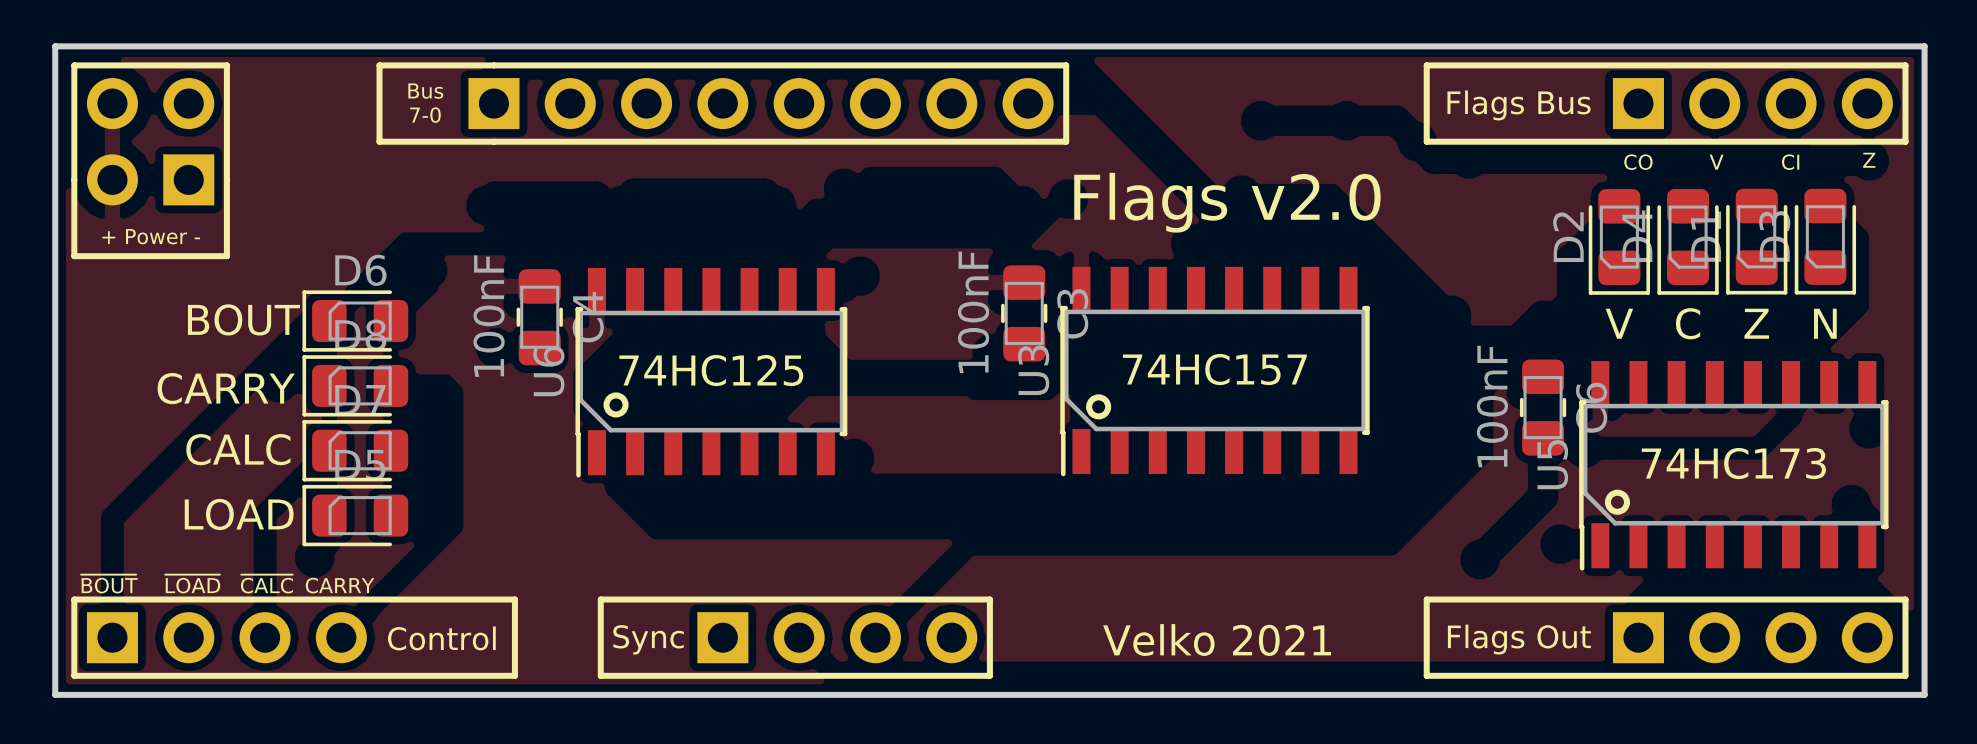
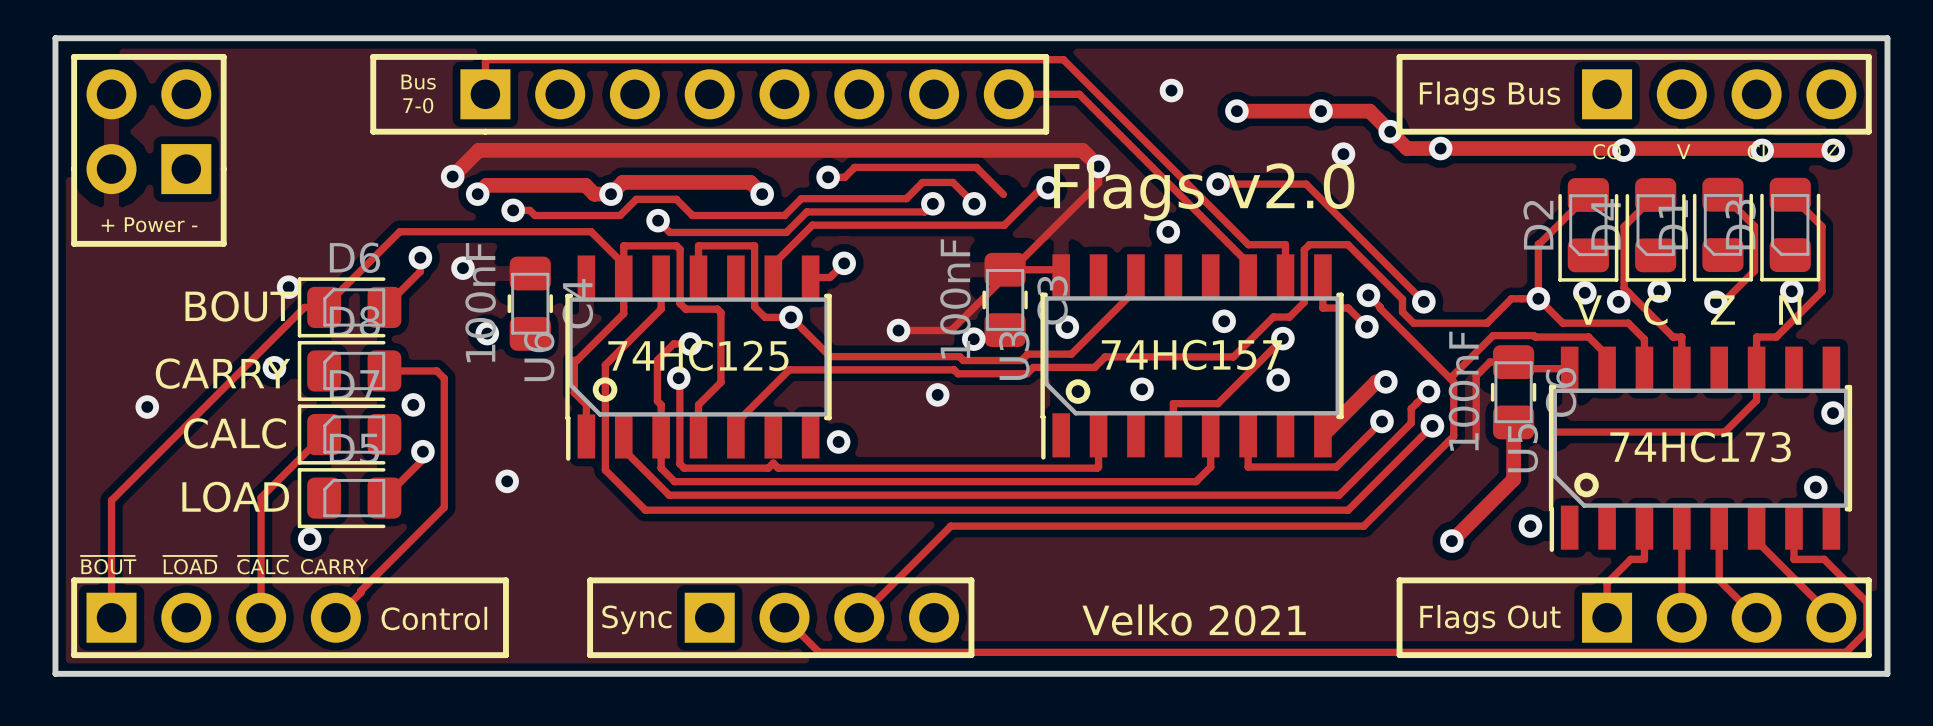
via: none -> (1171, 90)
track: none -> (485, 94) (485, 61) (487, 59) (1063, 59) (1248, 244) (1285, 244) (1285, 276)
track: none -> (1008, 94) (1079, 94) (1248, 263) (1248, 276)
track: none -> (1236, 111) (1369, 111) (1407, 148) (1759, 148)
via: none -> (1236, 111)
via: none -> (1321, 111)
via: none -> (1390, 131)
via: none -> (1440, 148)
via: none -> (1623, 150)
track: none -> (1762, 150) (1833, 150)
via: none -> (1762, 150)
via: none -> (1833, 150)
via: none -> (1343, 154)
via: none -> (1098, 166)
track: none -> (452, 176) (478, 150) (1082, 150) (1098, 166) (1098, 183) (951, 330) (898, 330)
via: none -> (452, 176)
track: none -> (828, 177) (844, 177) (854, 167) (976, 167) (1003, 194)
via: none -> (828, 177)
track: none -> (1218, 184) (1306, 184) (1423, 301)
via: none -> (1218, 184)
track: none -> (1048, 187) (1041, 187) (1004, 225) (812, 225) (773, 264) (773, 277)
via: none -> (1048, 187)
track: none -> (477, 194) (486, 185) (585, 185) (594, 194) (611, 194) (622, 182) (750, 182) (762, 194)
via: none -> (477, 194)
via: none -> (611, 194)
via: none -> (762, 194)
track: none -> (1588, 194) (1538, 244) (1538, 298)
track: none -> (1655, 194) (1624, 226) (1624, 288) (1628, 292)
track: none -> (1722, 194) (1754, 226) (1754, 270) (1723, 302) (1715, 302)
track: none -> (1790, 194) (1821, 226) (1821, 291) (1776, 337) (1756, 337) (1756, 400) (1724, 432) (1554, 432)
track: none -> (932, 203) (924, 211) (806, 211) (786, 232) (669, 232) (658, 220)
via: none -> (932, 203)
track: none -> (974, 203) (952, 182) (922, 182) (906, 198) (801, 198) (784, 215) (692, 215) (676, 199) (636, 199) (620, 215) (534, 215) (529, 210) (513, 210)
via: none -> (974, 203)
via: none -> (513, 210)
via: none -> (658, 220)
via: none -> (1168, 231)
track: none -> (420, 257) (420, 271) (384, 307)
via: none -> (420, 257)
track: none -> (623, 264) (591, 231) (399, 231) (324, 307) (304, 307) (111, 500) (111, 617)
track: none -> (844, 263) (830, 277) (810, 277)
via: none -> (844, 263)
via: none -> (462, 268)
track: none -> (1005, 269) (1054, 269) (1061, 276)
track: none -> (1135, 276) (1135, 289) (1071, 354) (1027, 354) (1021, 360) (963, 360) (959, 356) (830, 356) (790, 317) (765, 317) (754, 306) (754, 245) (698, 245) (698, 277)
track: none -> (1322, 276) (1322, 308) (1348, 308) (1366, 326)
track: none -> (661, 277) (661, 309) (605, 364) (605, 470) (645, 510) (1348, 510) (1432, 425)
via: none -> (288, 287)
via: none -> (1659, 291)
via: none -> (1791, 291)
via: none -> (1584, 292)
track: none -> (1628, 292) (1673, 337) (1681, 337) (1681, 368)
track: none -> (1368, 295) (1453, 382) (1453, 436) (1363, 526) (950, 526) (859, 617)
via: none -> (1368, 295)
track: none -> (1538, 298) (1562, 323) (1628, 323) (1644, 339) (1644, 368)
track: none -> (1538, 298) (1511, 298) (1487, 323) (1413, 323) (1402, 312) (1402, 299) (1348, 244) (1309, 244) (1304, 249) (1304, 302) (1289, 317) (1273, 317) (1233, 356) (1105, 356) (1094, 367) (1033, 367) (1026, 373) (958, 373) (954, 369) (789, 369) (735, 423) (735, 436)
via: none -> (1538, 298)
via: none -> (1423, 301)
via: none -> (1618, 301)
via: none -> (1715, 302)
via: none -> (790, 317)
via: none -> (1224, 321)
via: none -> (1366, 326)
via: none -> (1067, 327)
via: none -> (898, 330)
via: none -> (487, 333)
track: none -> (1282, 338) (1217, 403) (1173, 403) (1173, 435)
via: none -> (1282, 338)
via: none -> (973, 339)
track: none -> (690, 343) (673, 343) (657, 360) (657, 401) (661, 404) (661, 468) (674, 481) (1196, 481) (1210, 466) (1210, 435)
via: none -> (690, 343)
via: none -> (274, 367)
track: none -> (1569, 368) (1520, 368) (1513, 362) (1490, 362) (1476, 375) (1476, 438)
track: none -> (1607, 368) (1607, 355) (1588, 337) (1493, 335) (1450, 378)
track: none -> (384, 370) (436, 370) (444, 378) (444, 507) (335, 617)
track: none -> (678, 378) (679, 463) (684, 468) (768, 468) (773, 463) (778, 468) (1097, 468) (1098, 435)
via: none -> (678, 378)
via: none -> (1278, 380)
track: none -> (1385, 381) (1376, 381) (1322, 435)
via: none -> (1385, 381)
via: none -> (1142, 389)
track: none -> (1428, 391) (1411, 408) (1411, 423) (1339, 495) (669, 495) (623, 449) (623, 436)
via: none -> (1428, 391)
via: none -> (937, 394)
via: none -> (413, 404)
via: none -> (147, 407)
via: none -> (1833, 413)
track: none -> (1381, 421) (1336, 466) (1248, 466) (1248, 435)
via: none -> (1381, 421)
track: none -> (1513, 422) (1513, 479) (1451, 541)
via: none -> (1432, 425)
track: none -> (324, 434) (261, 497) (261, 617)
track: none -> (586, 436) (586, 404) (574, 392) (574, 360) (577, 360) (623, 313) (623, 245) (676, 245) (680, 249) (680, 303) (685, 309) (717, 309) (720, 312) (720, 382) (698, 404) (698, 436)
via: none -> (838, 441)
track: none -> (422, 451) (422, 459) (384, 498)
via: none -> (422, 451)
via: none -> (507, 481)
via: none -> (1815, 487)
via: none -> (1530, 526)
track: none -> (1644, 527) (1644, 559) (1630, 559) (1607, 583) (1607, 617)
track: none -> (1681, 527) (1681, 617)
track: none -> (1719, 527) (1719, 580) (1756, 617)
track: none -> (1756, 527) (1756, 540) (1831, 617)
track: none -> (1793, 527) (1793, 559) (1824, 559) (1866, 602) (1866, 631) (1845, 652) (819, 652) (784, 617)
via: none -> (309, 539)
via: none -> (1451, 541)

